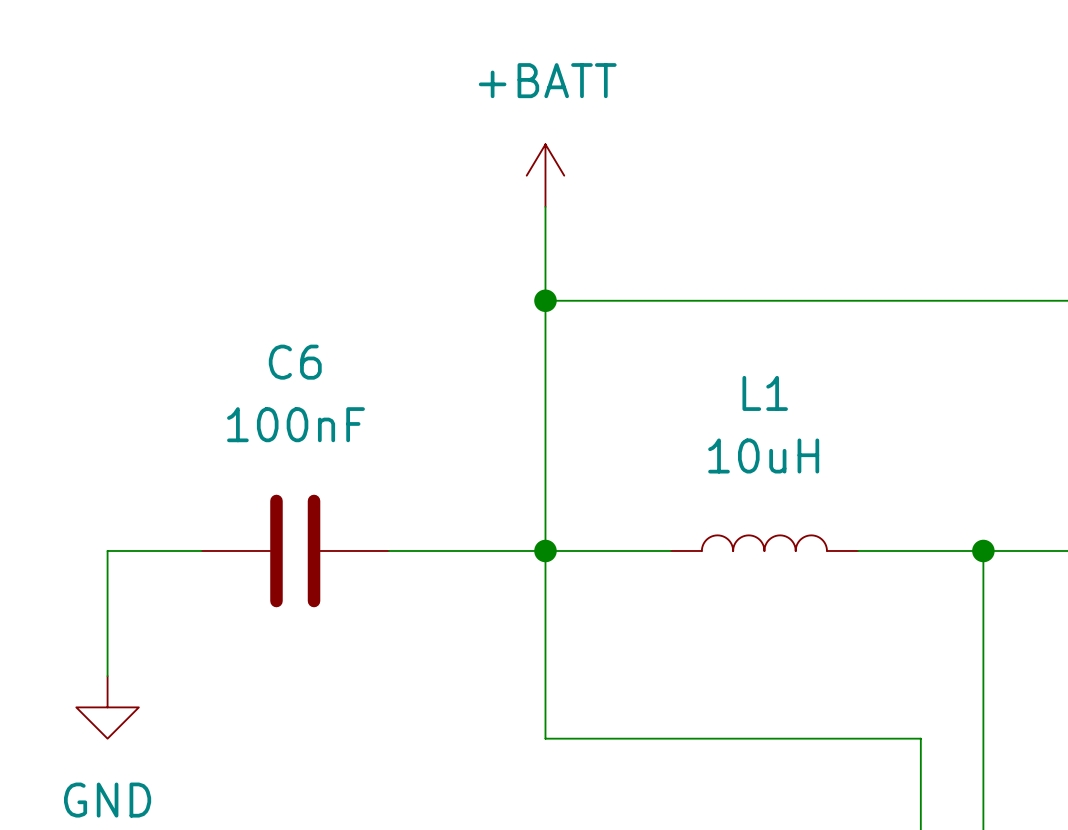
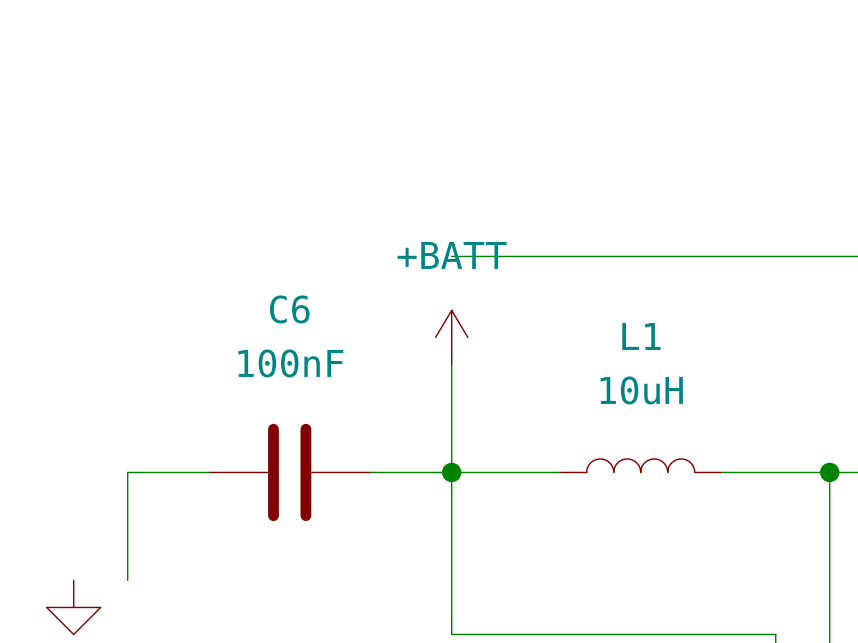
power symbol position: +BATT (545, 175) -> +BATT (451, 337)
wire: (545, 206) (545, 425) -> none
junction: (545, 300) -> none
wire: (170, 550) (107, 550) (107, 676) -> (127, 472) (127, 580)
C6 position: (295, 550) -> (289, 472)

